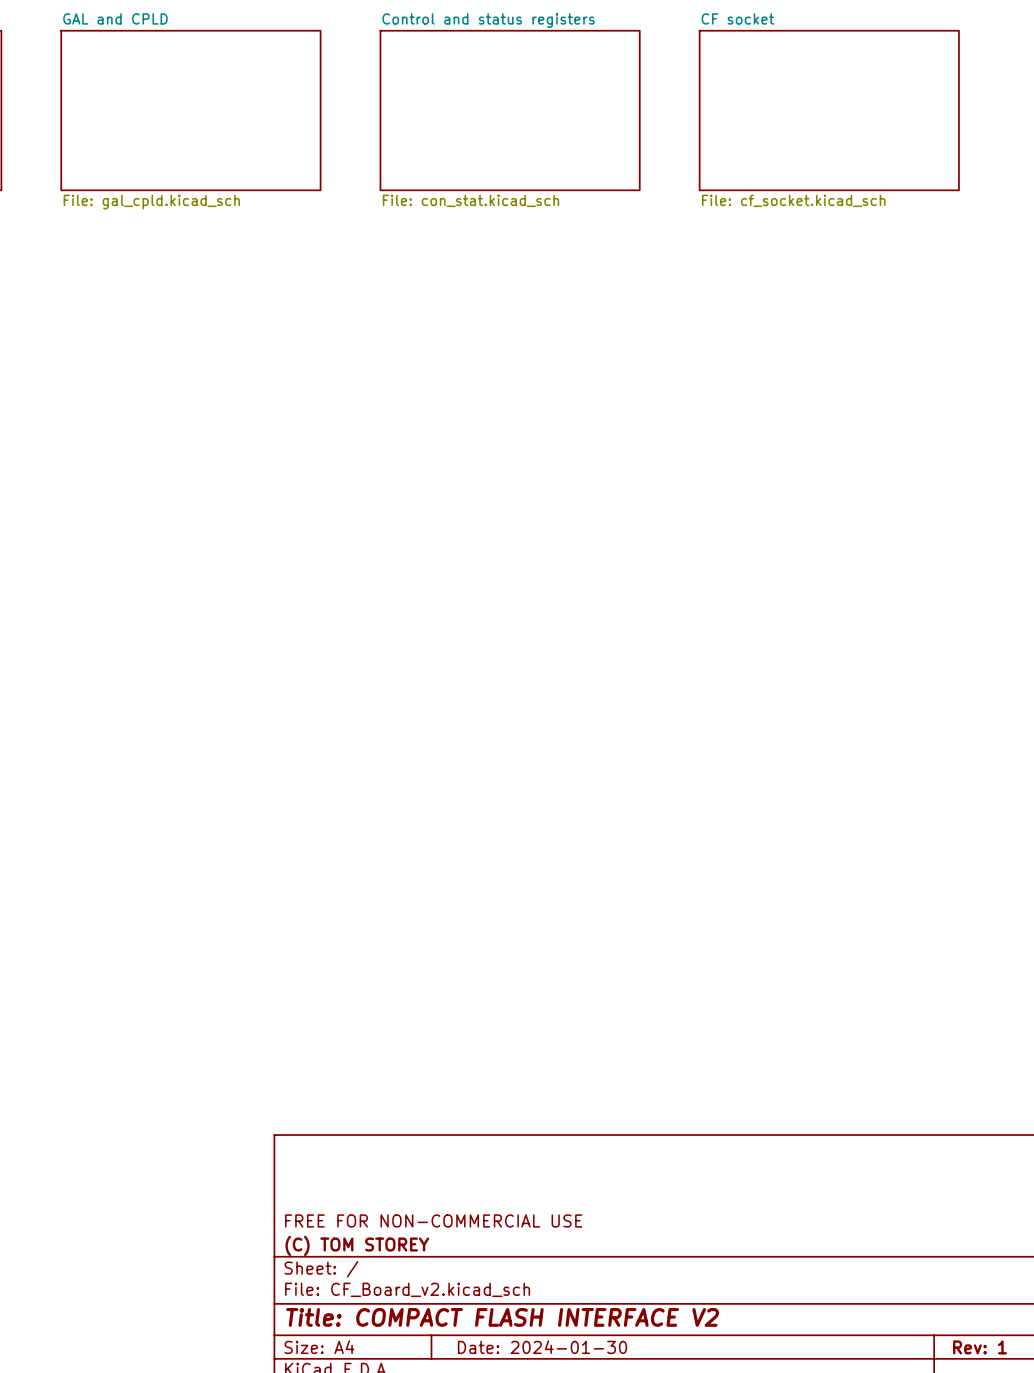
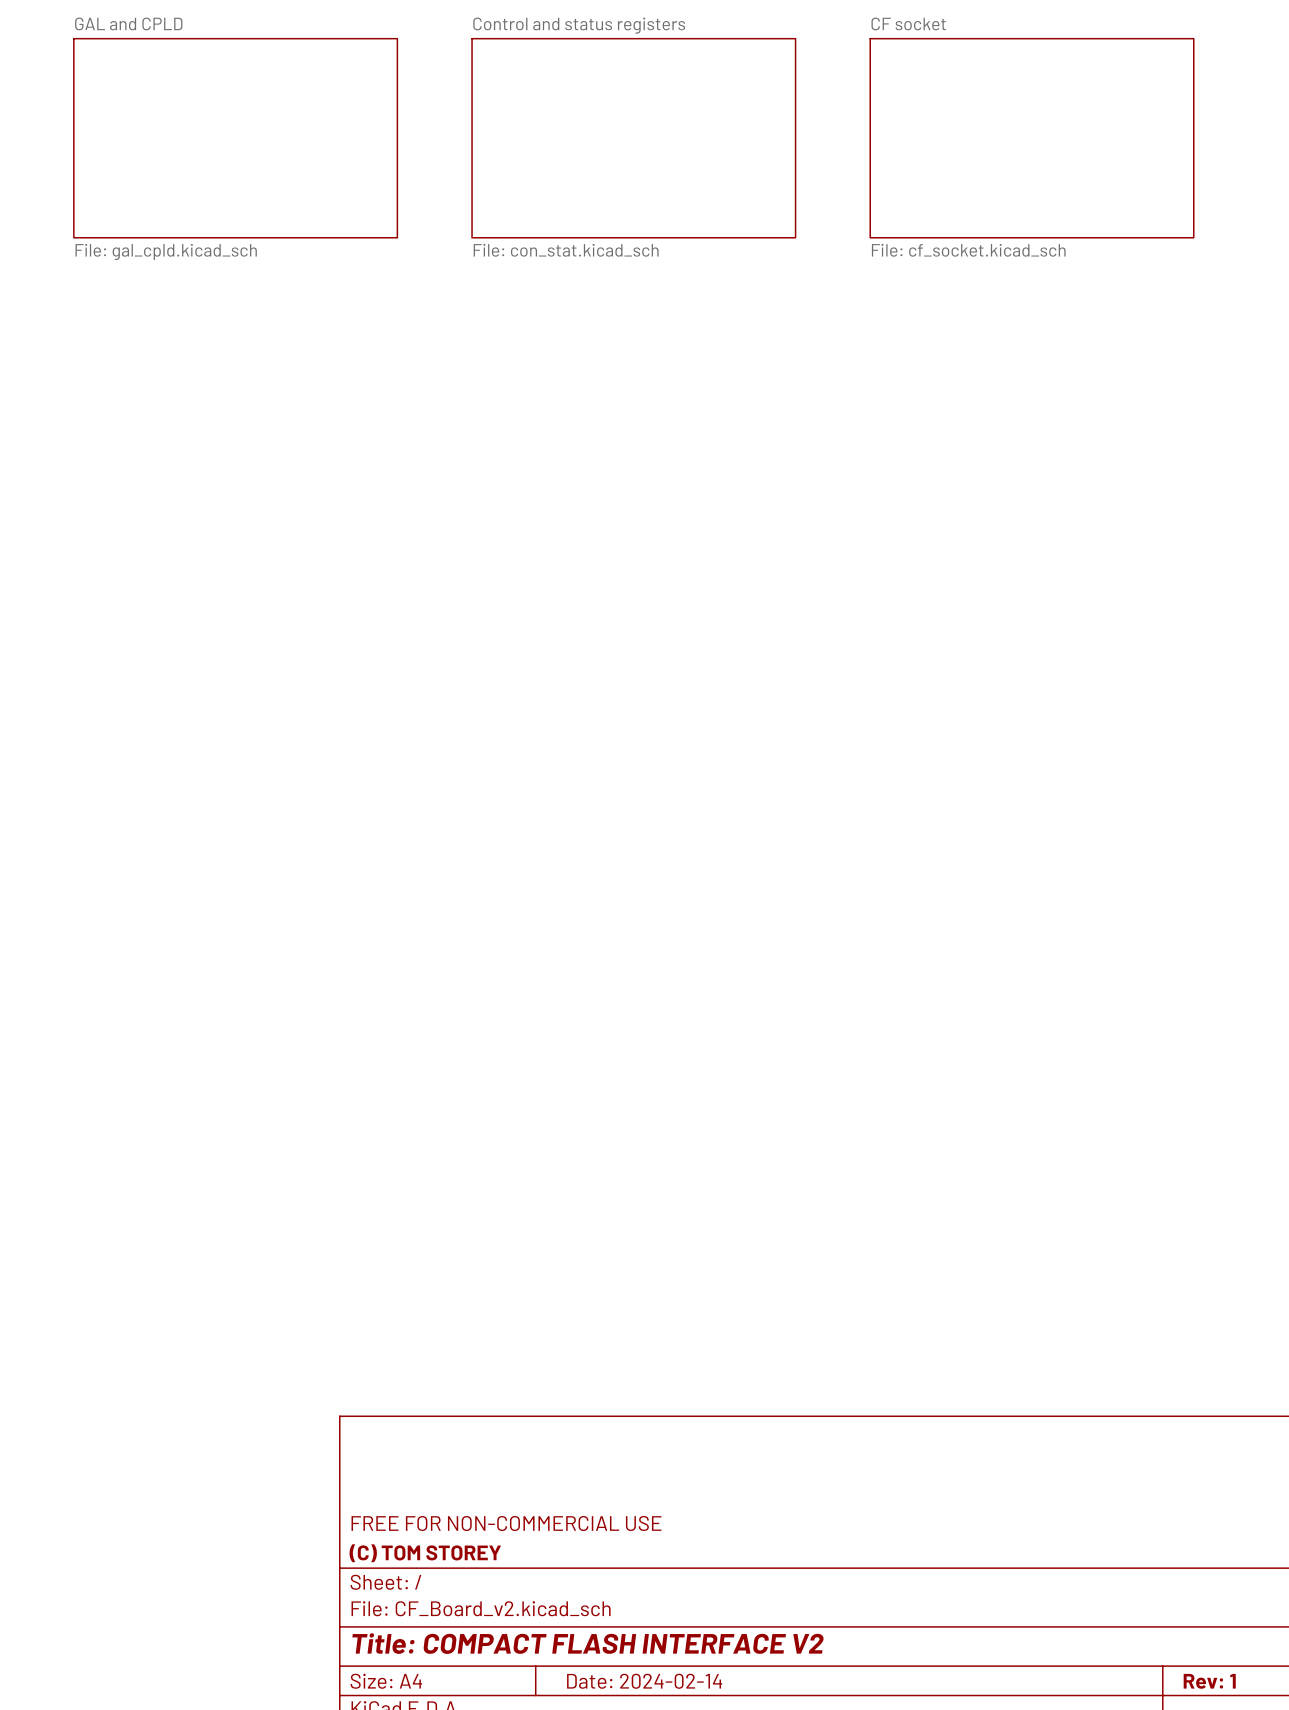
title block: Date: 2024-01-30 (542, 1347) -> Date: 2024-02-14 (644, 1681)

